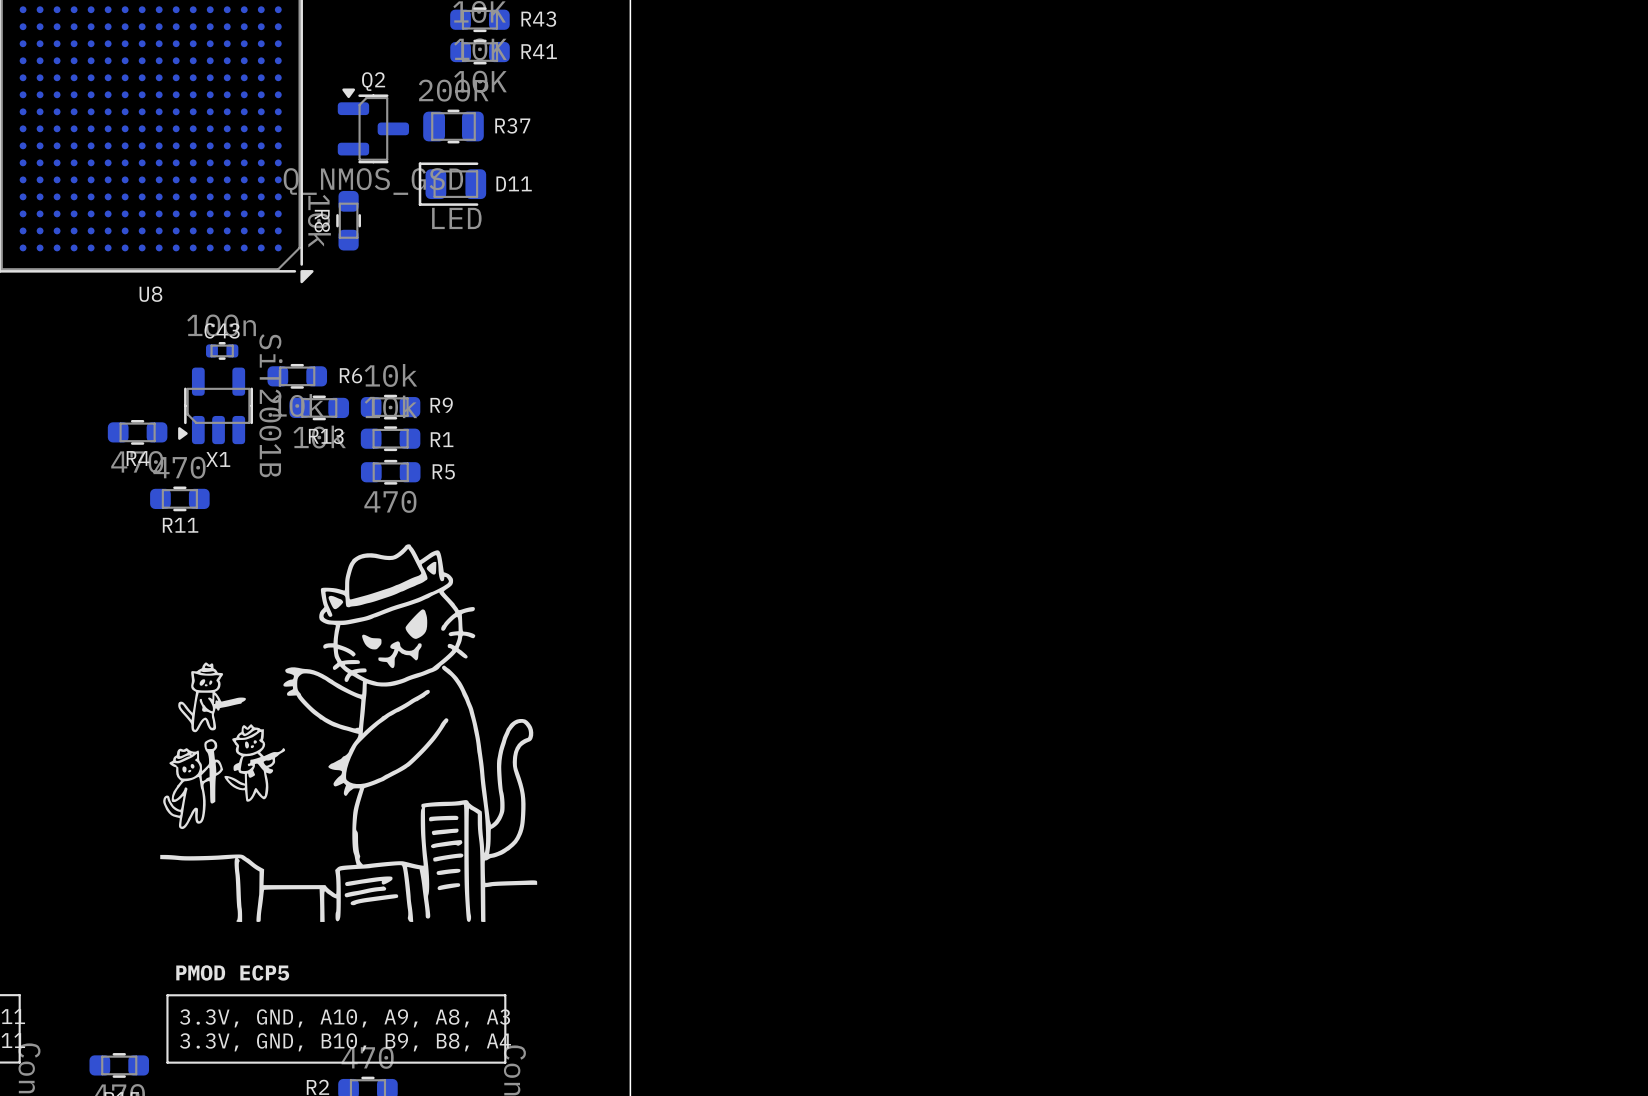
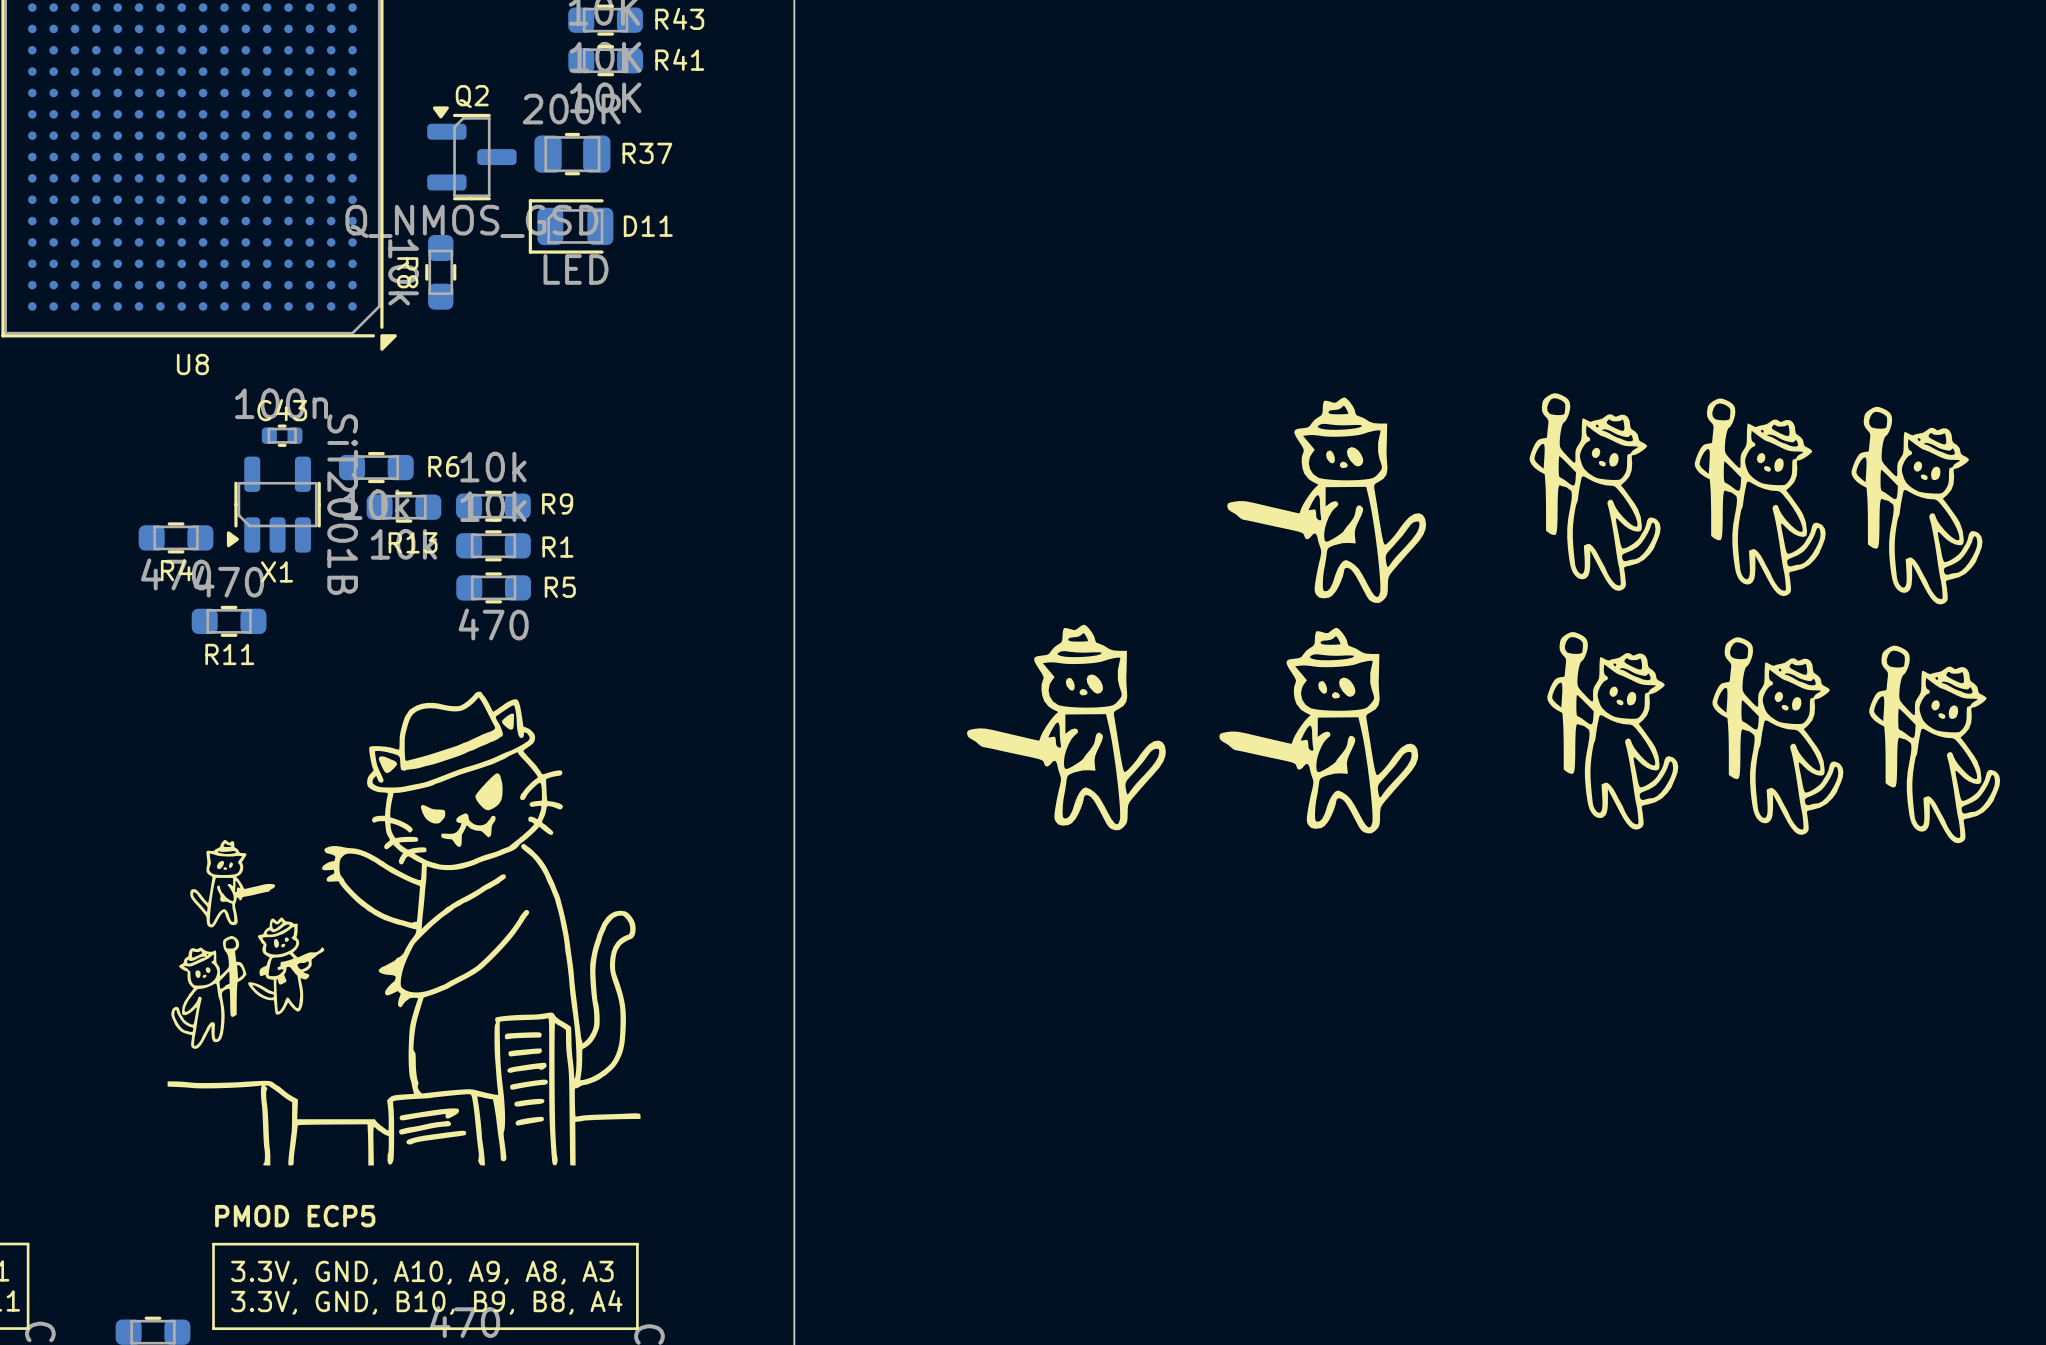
drawing: none -> [1529, 393, 1661, 591]
drawing: none -> [1219, 397, 1427, 834]
drawing: none -> [1694, 398, 1983, 605]
drawing: none -> [967, 624, 1166, 831]
drawing: none -> [1547, 632, 1679, 830]
drawing: none -> [1712, 637, 2001, 844]
drawing position: (348, 733) -> (404, 928)

